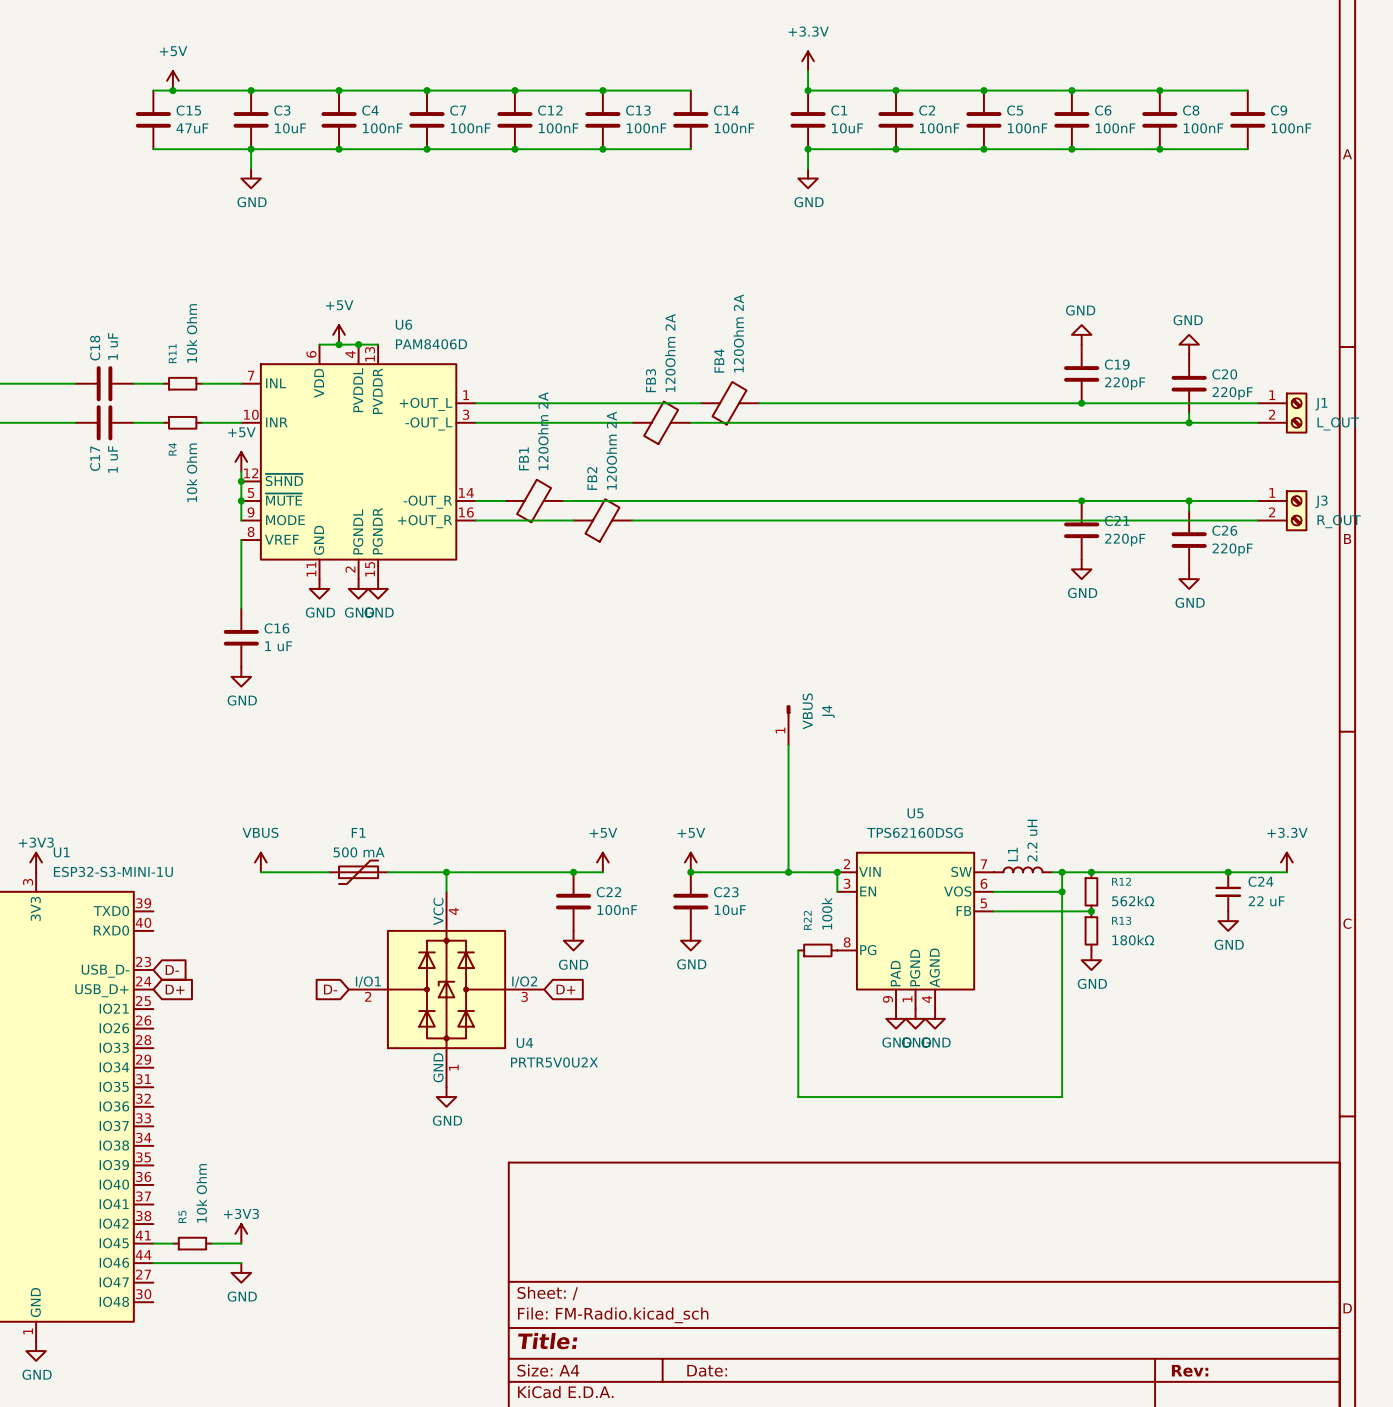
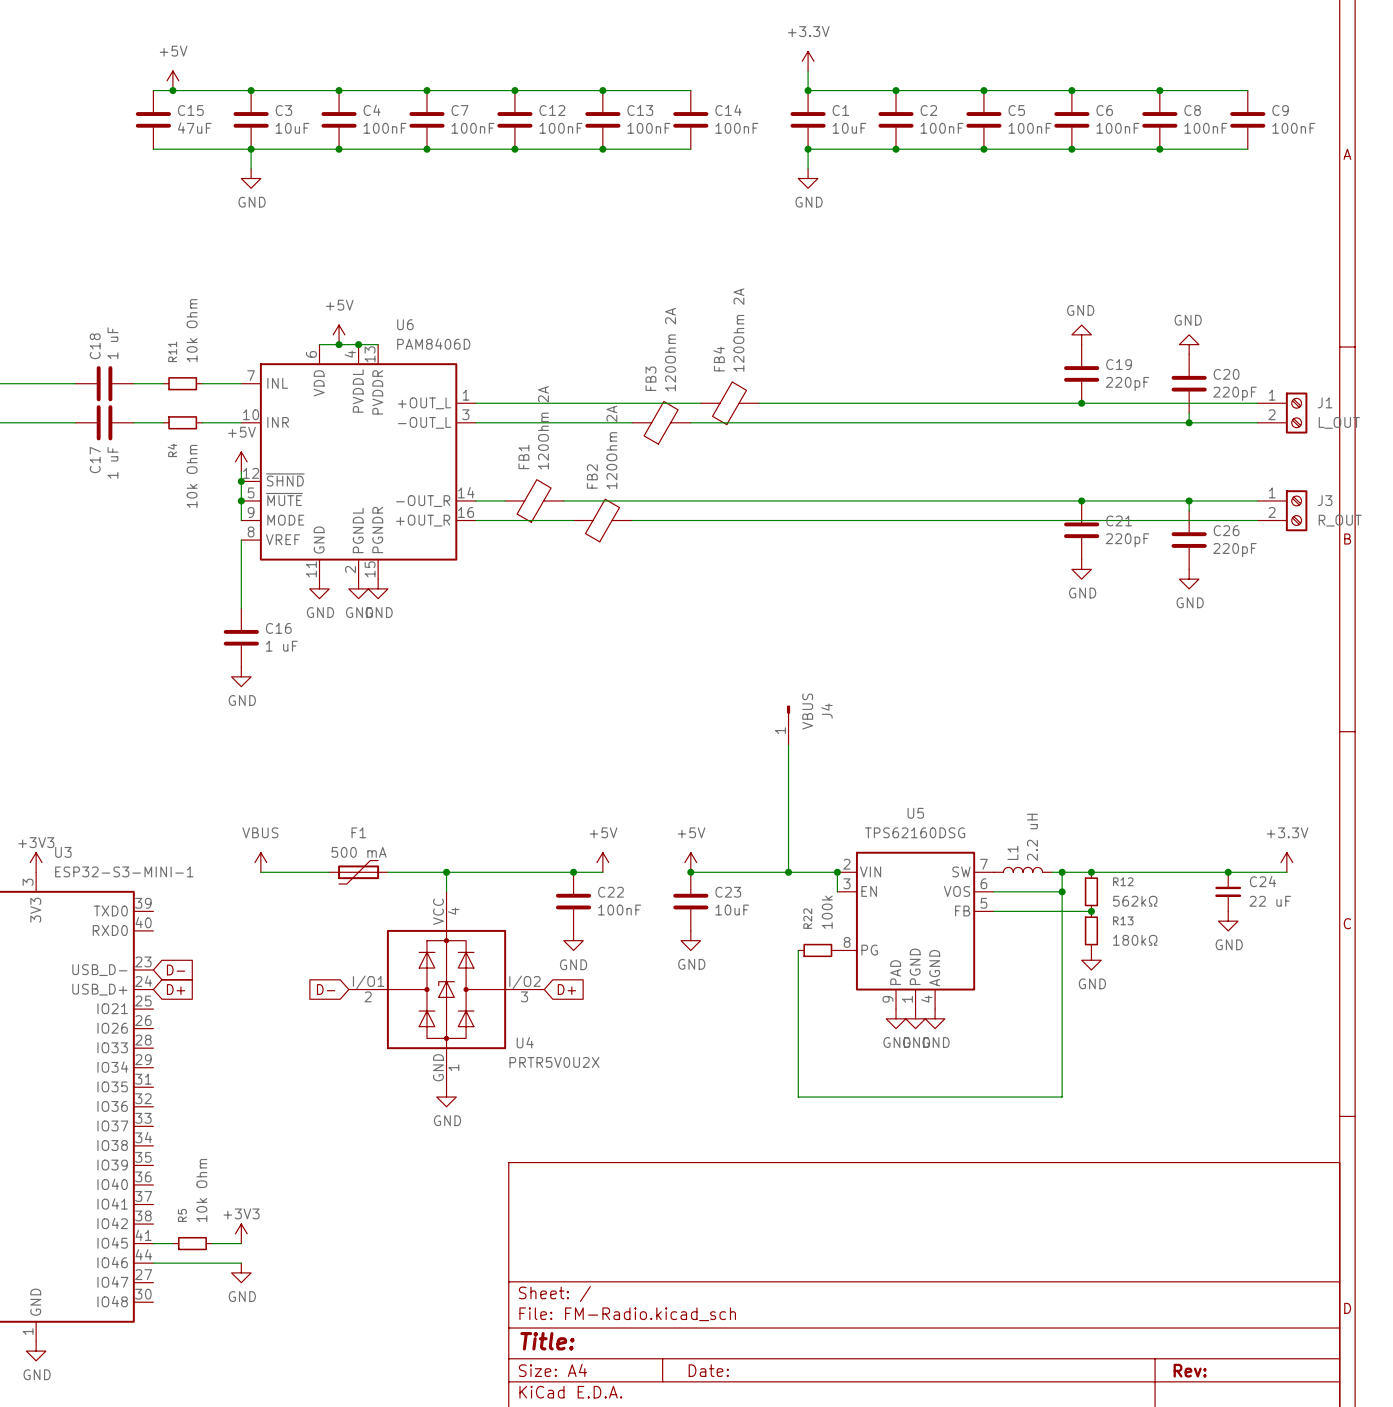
U1 name: U1 (61, 852) -> U3 (63, 852)
U1 value: ESP32-S3-MINI-1U (113, 871) -> ESP32-S3-MINI-1 (124, 871)

